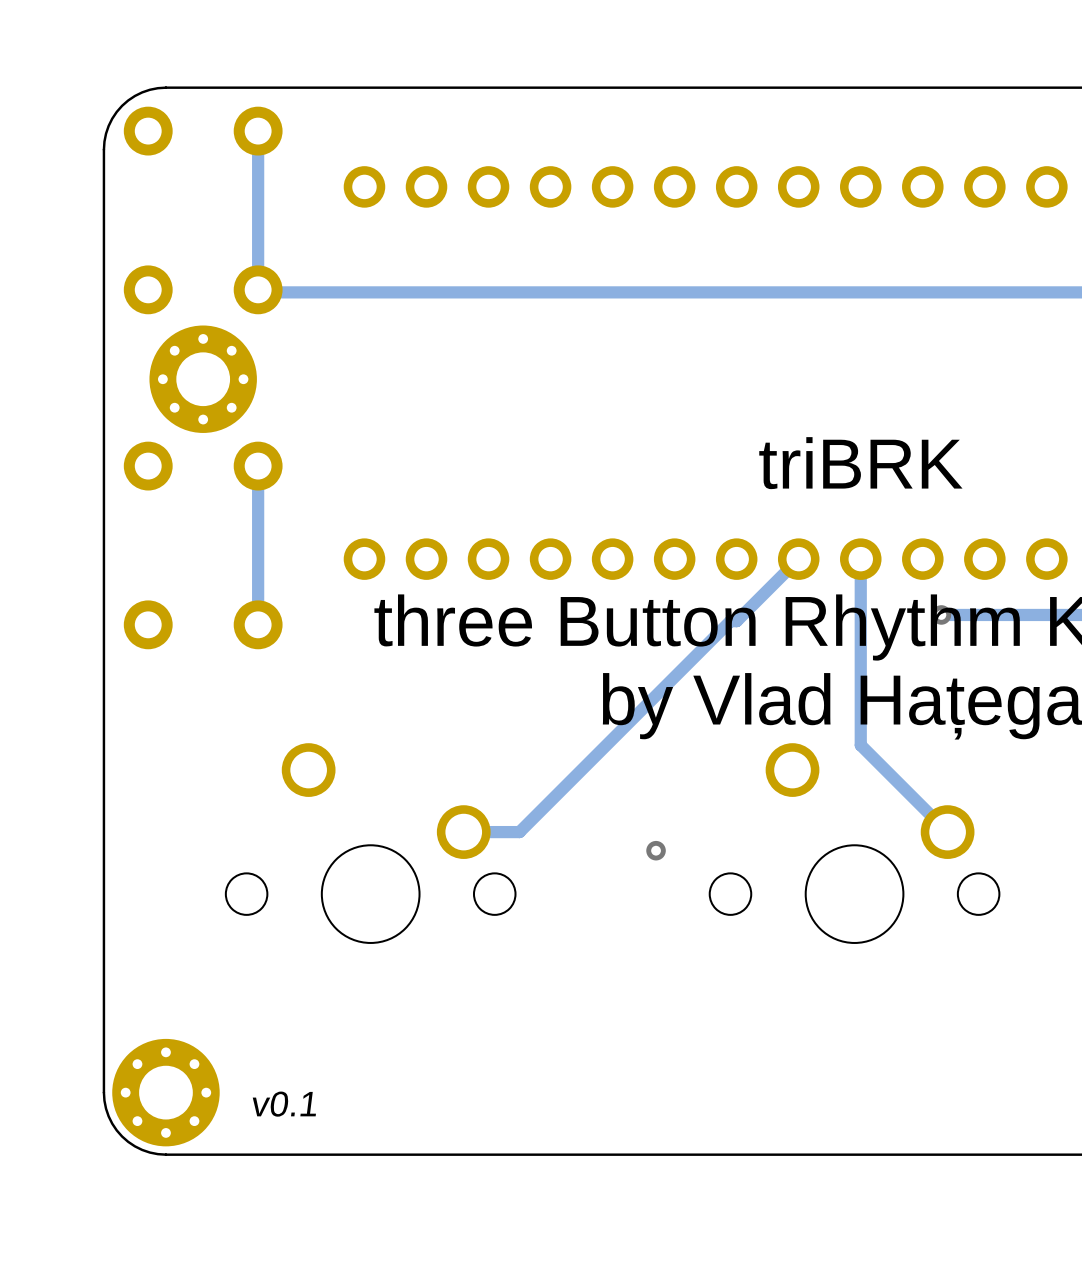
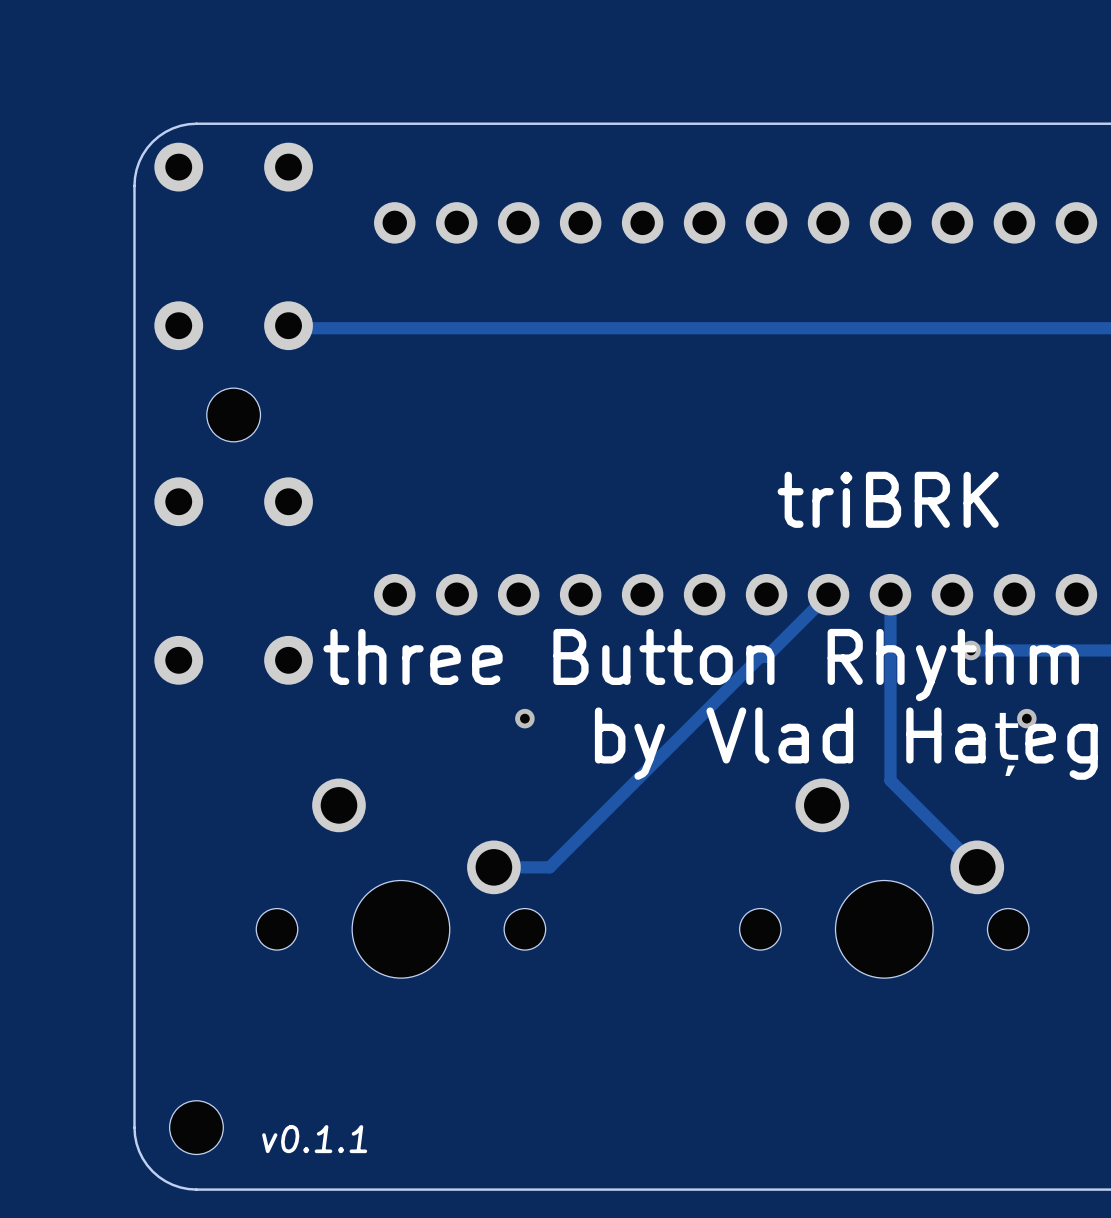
track: (258, 131) (258, 289) -> none
part footprint: [149, 325, 257, 433] -> [206, 388, 261, 442]
track: (258, 466) (258, 624) -> none
via: none -> (524, 718)
via: none -> (1026, 718)
via: (656, 850) -> none
part footprint: [112, 1038, 220, 1147] -> [169, 1100, 224, 1155]
text: v0.1 (284, 1104) -> v0.1.1 (314, 1139)

